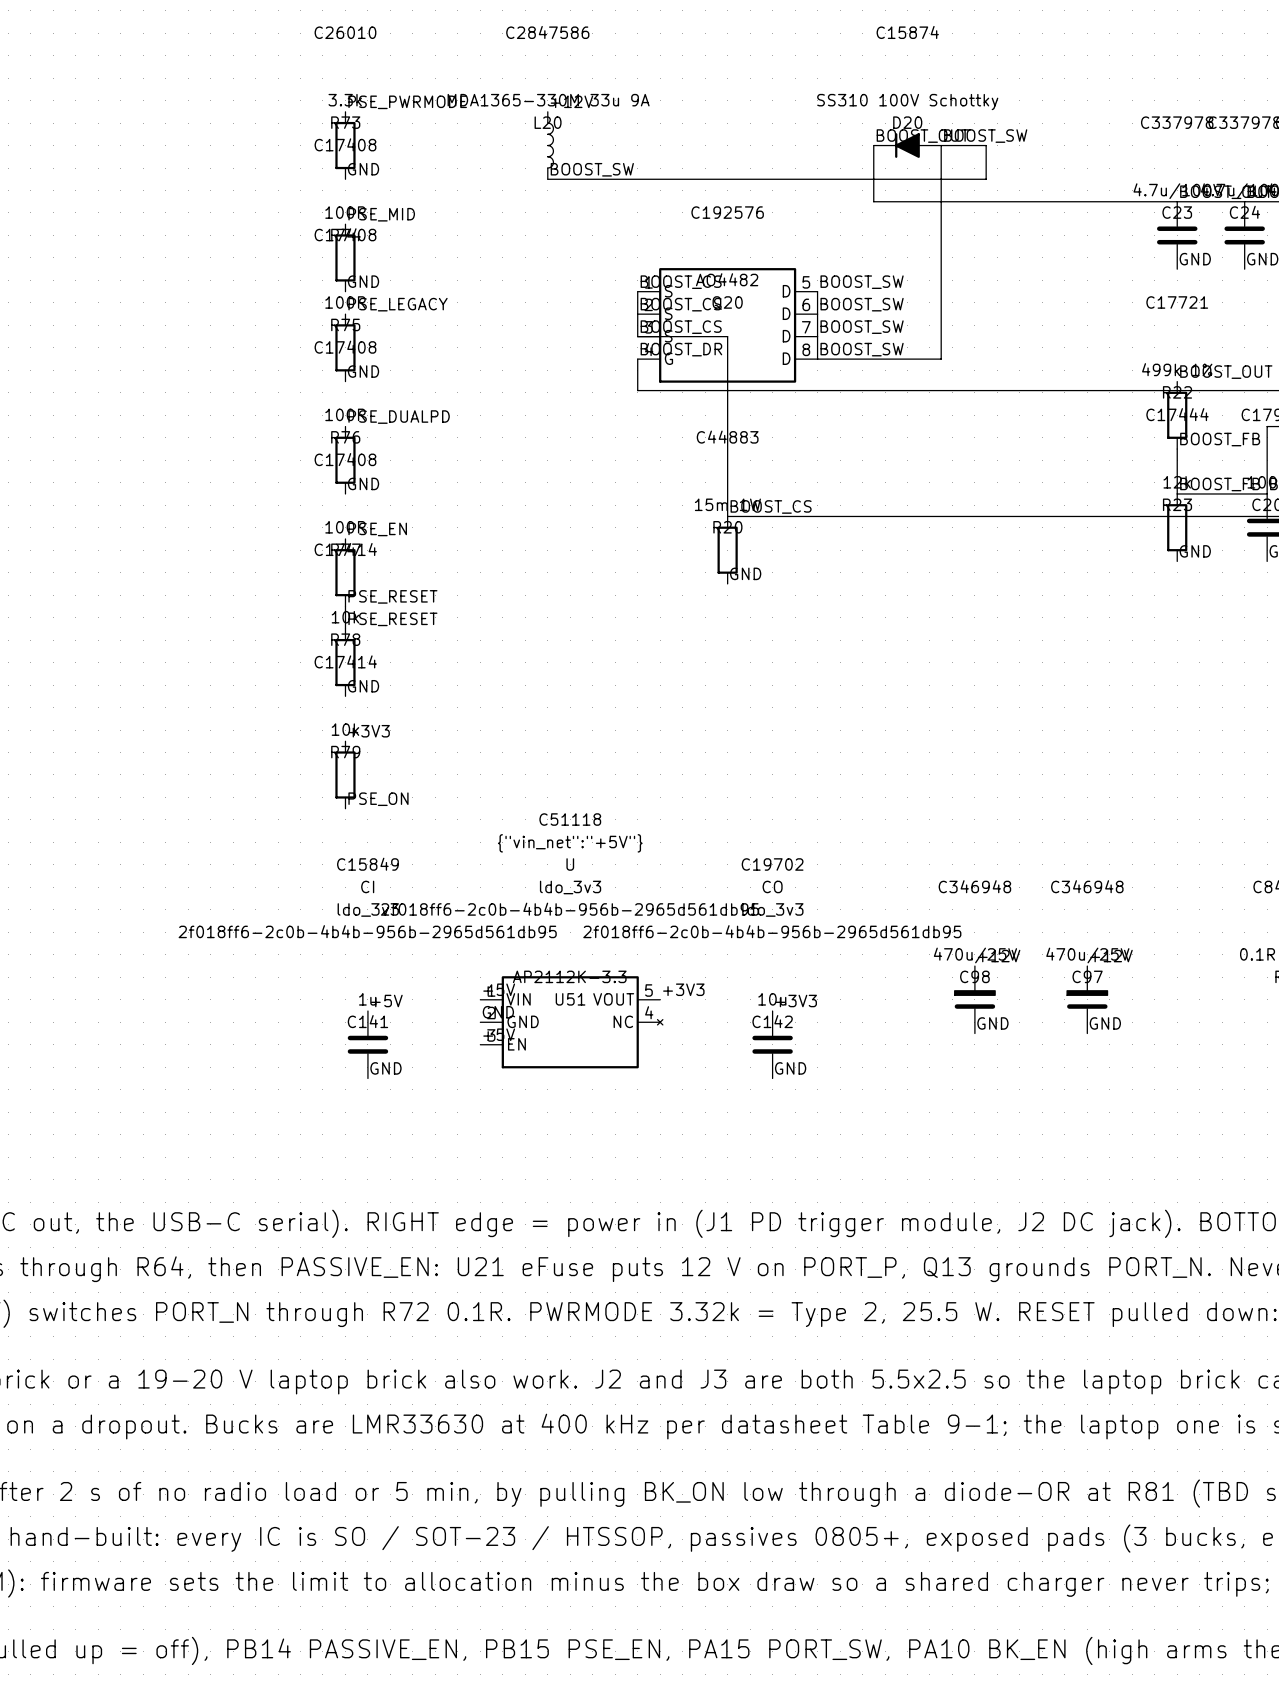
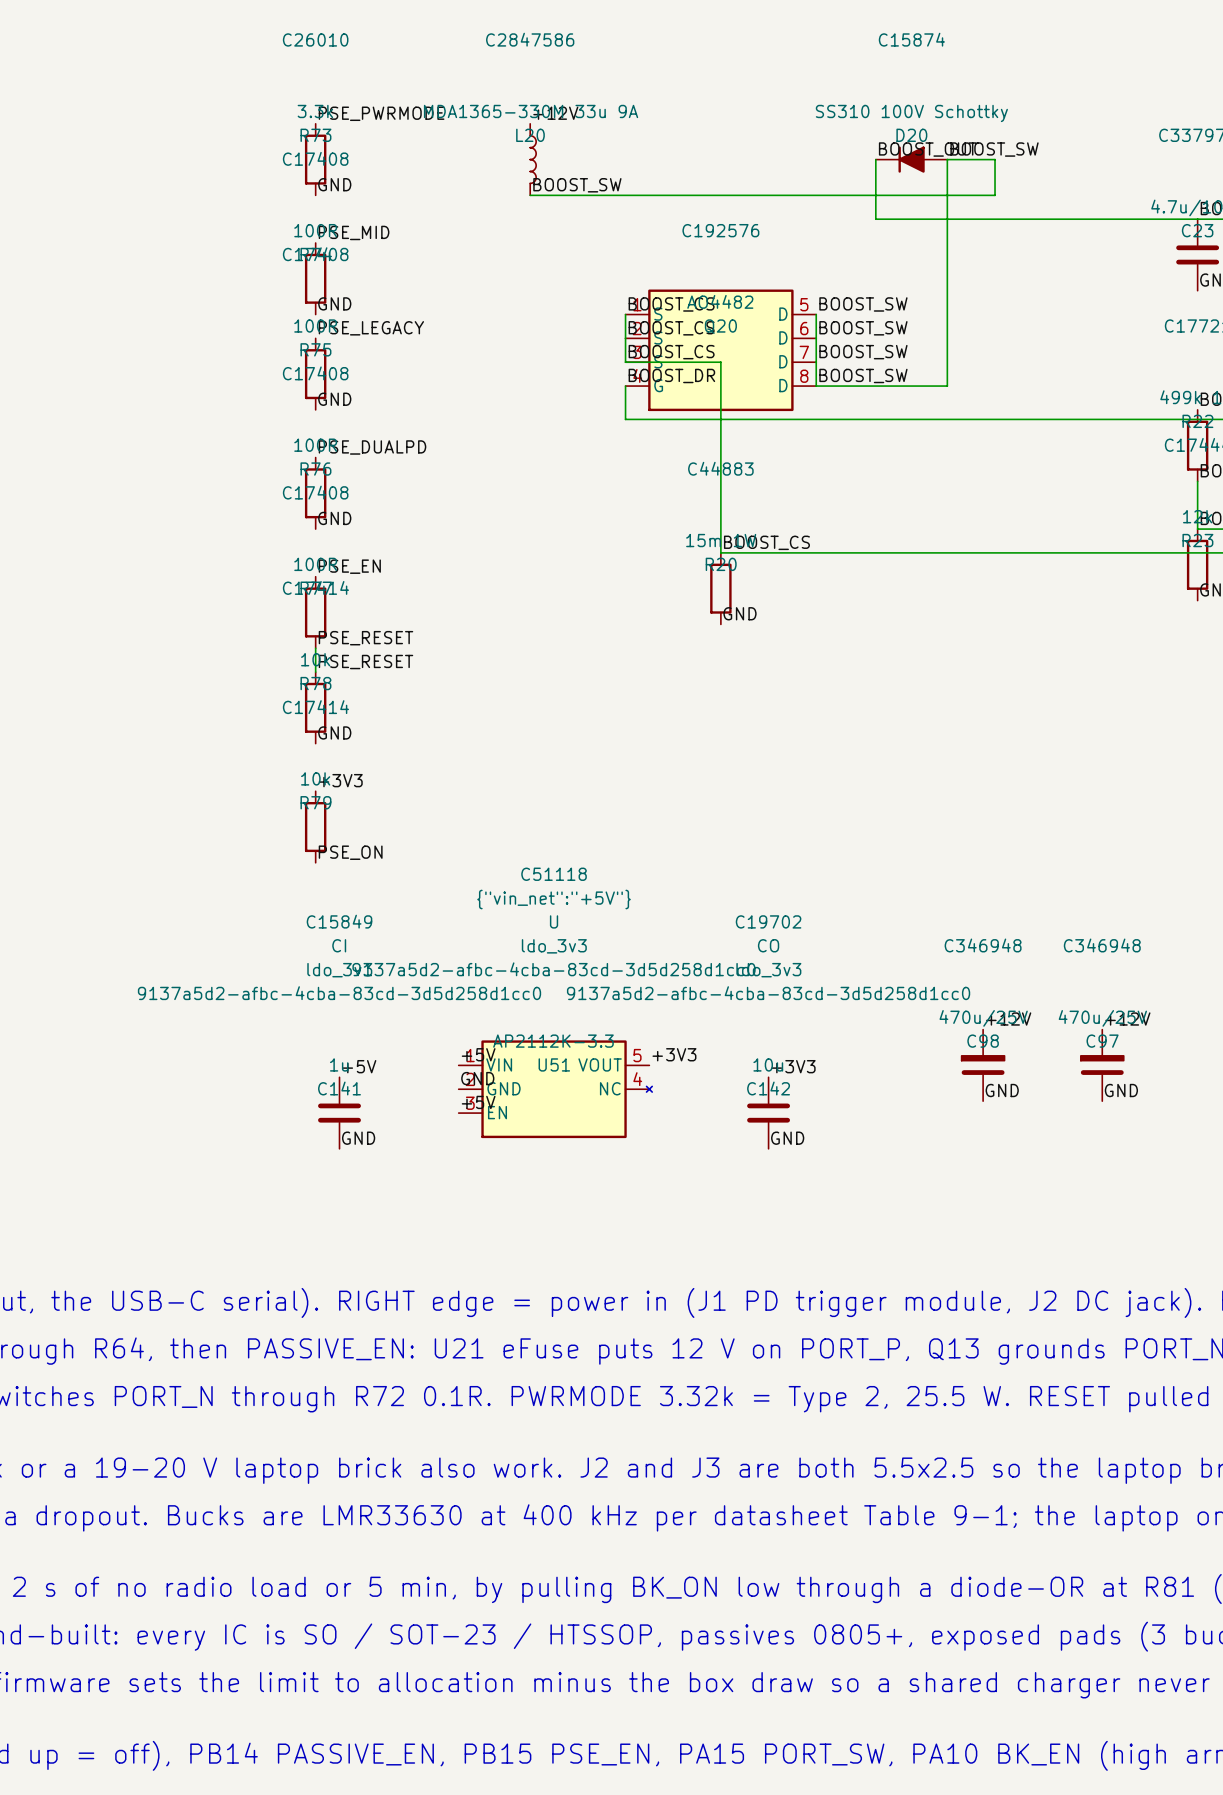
U51 text: 2f018ff6-2c0b-4b4b-956b-2965d561db95 (570, 909) -> 9137a5d2-afbc-4cba-83cd-3d5d258d1cc0 (554, 969)
C141 text: 2f018ff6-2c0b-4b4b-956b-2965d561db95 (367, 931) -> 9137a5d2-afbc-4cba-83cd-3d5d258d1cc0 (339, 993)
C142 text: 2f018ff6-2c0b-4b4b-956b-2965d561db95 (772, 931) -> 9137a5d2-afbc-4cba-83cd-3d5d258d1cc0 (768, 993)

